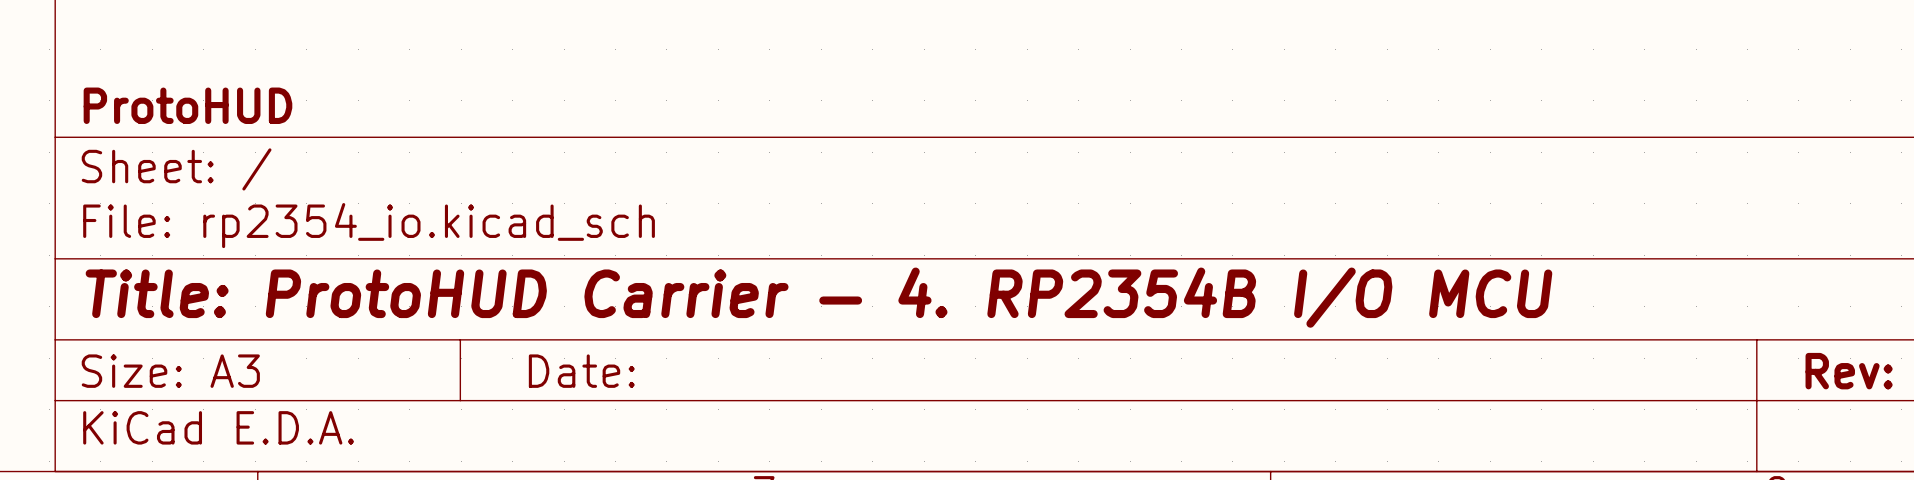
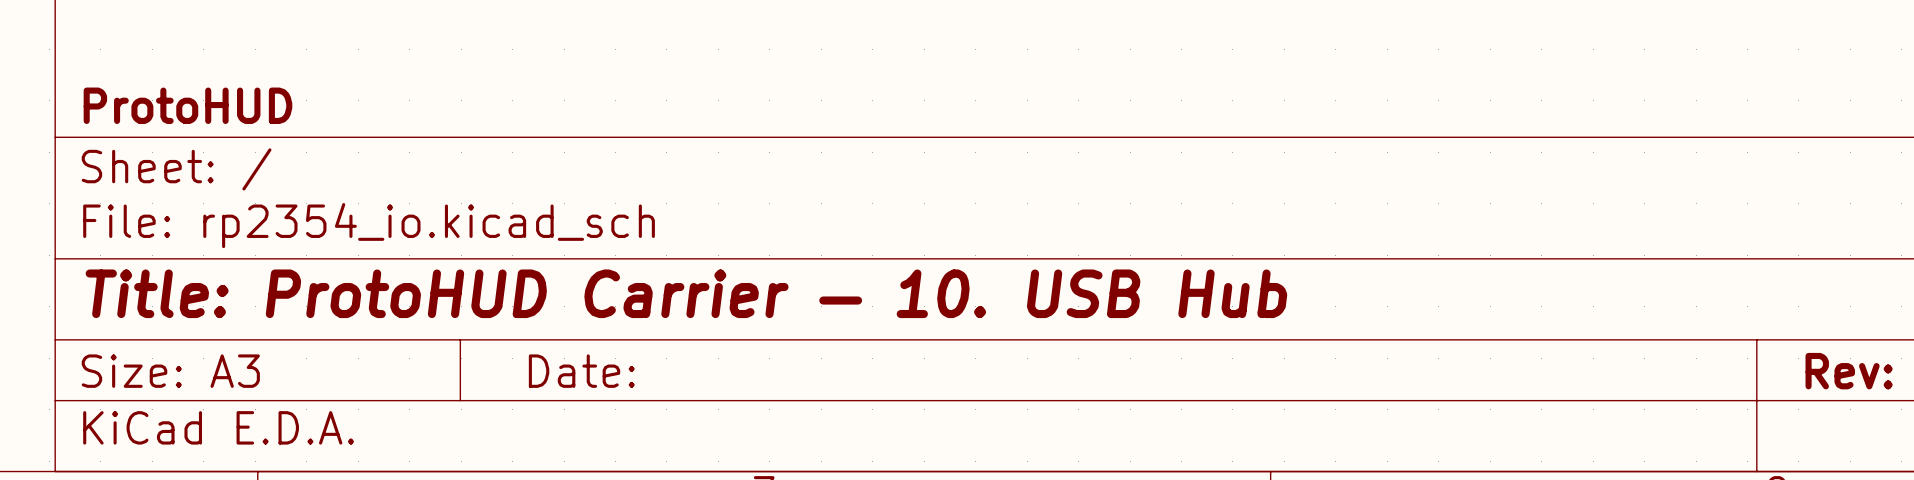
title block: Title: ProtoHUD Carrier — 4. RP2354B I/O MCU (818, 297) -> Title: ProtoHUD Carrier — 10. USB Hub (686, 293)

